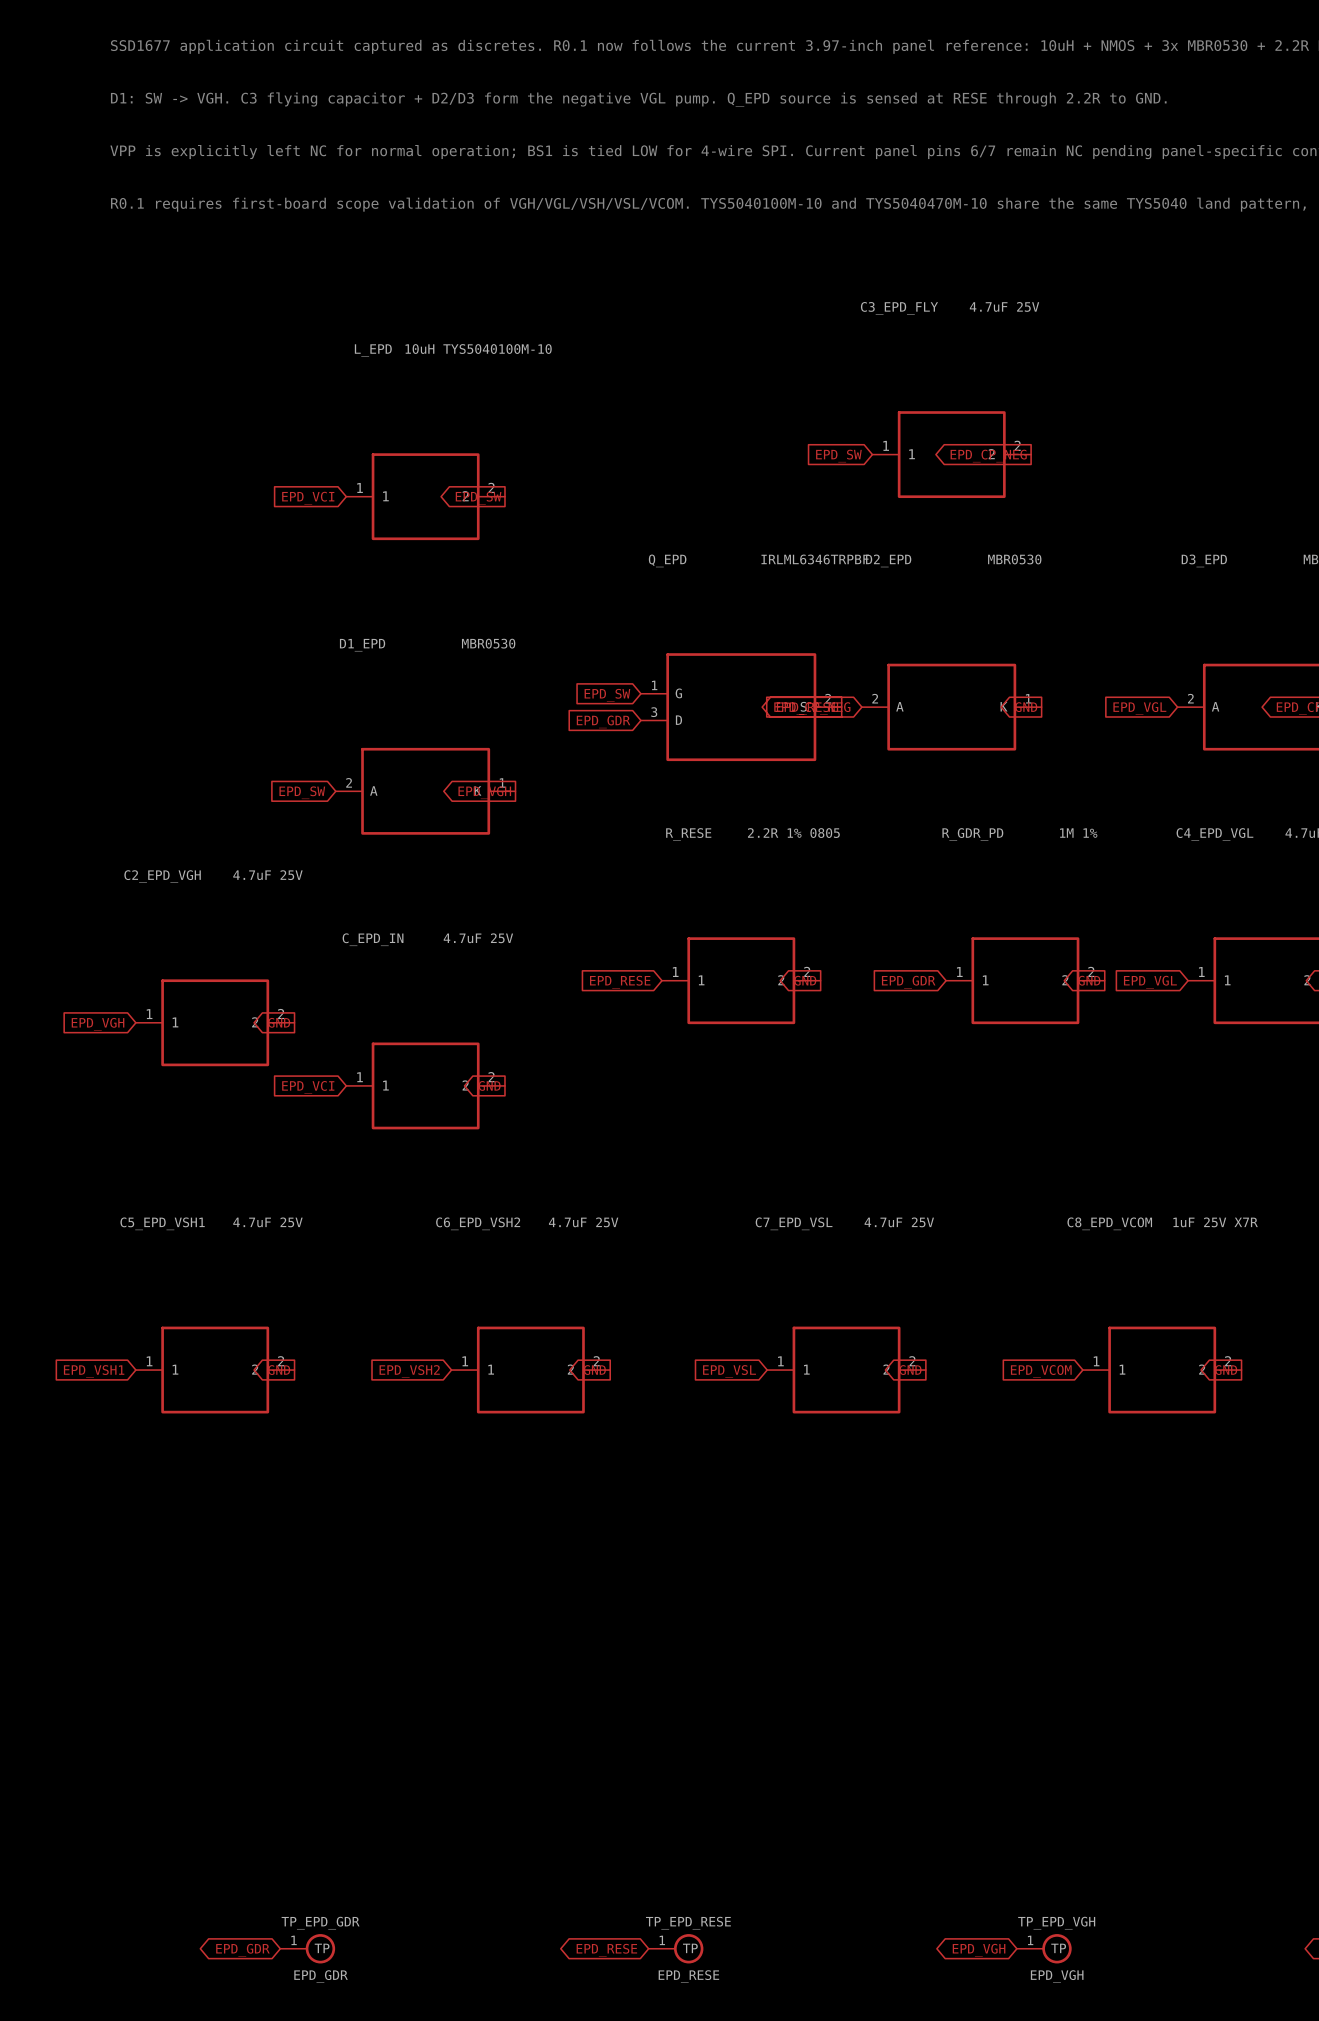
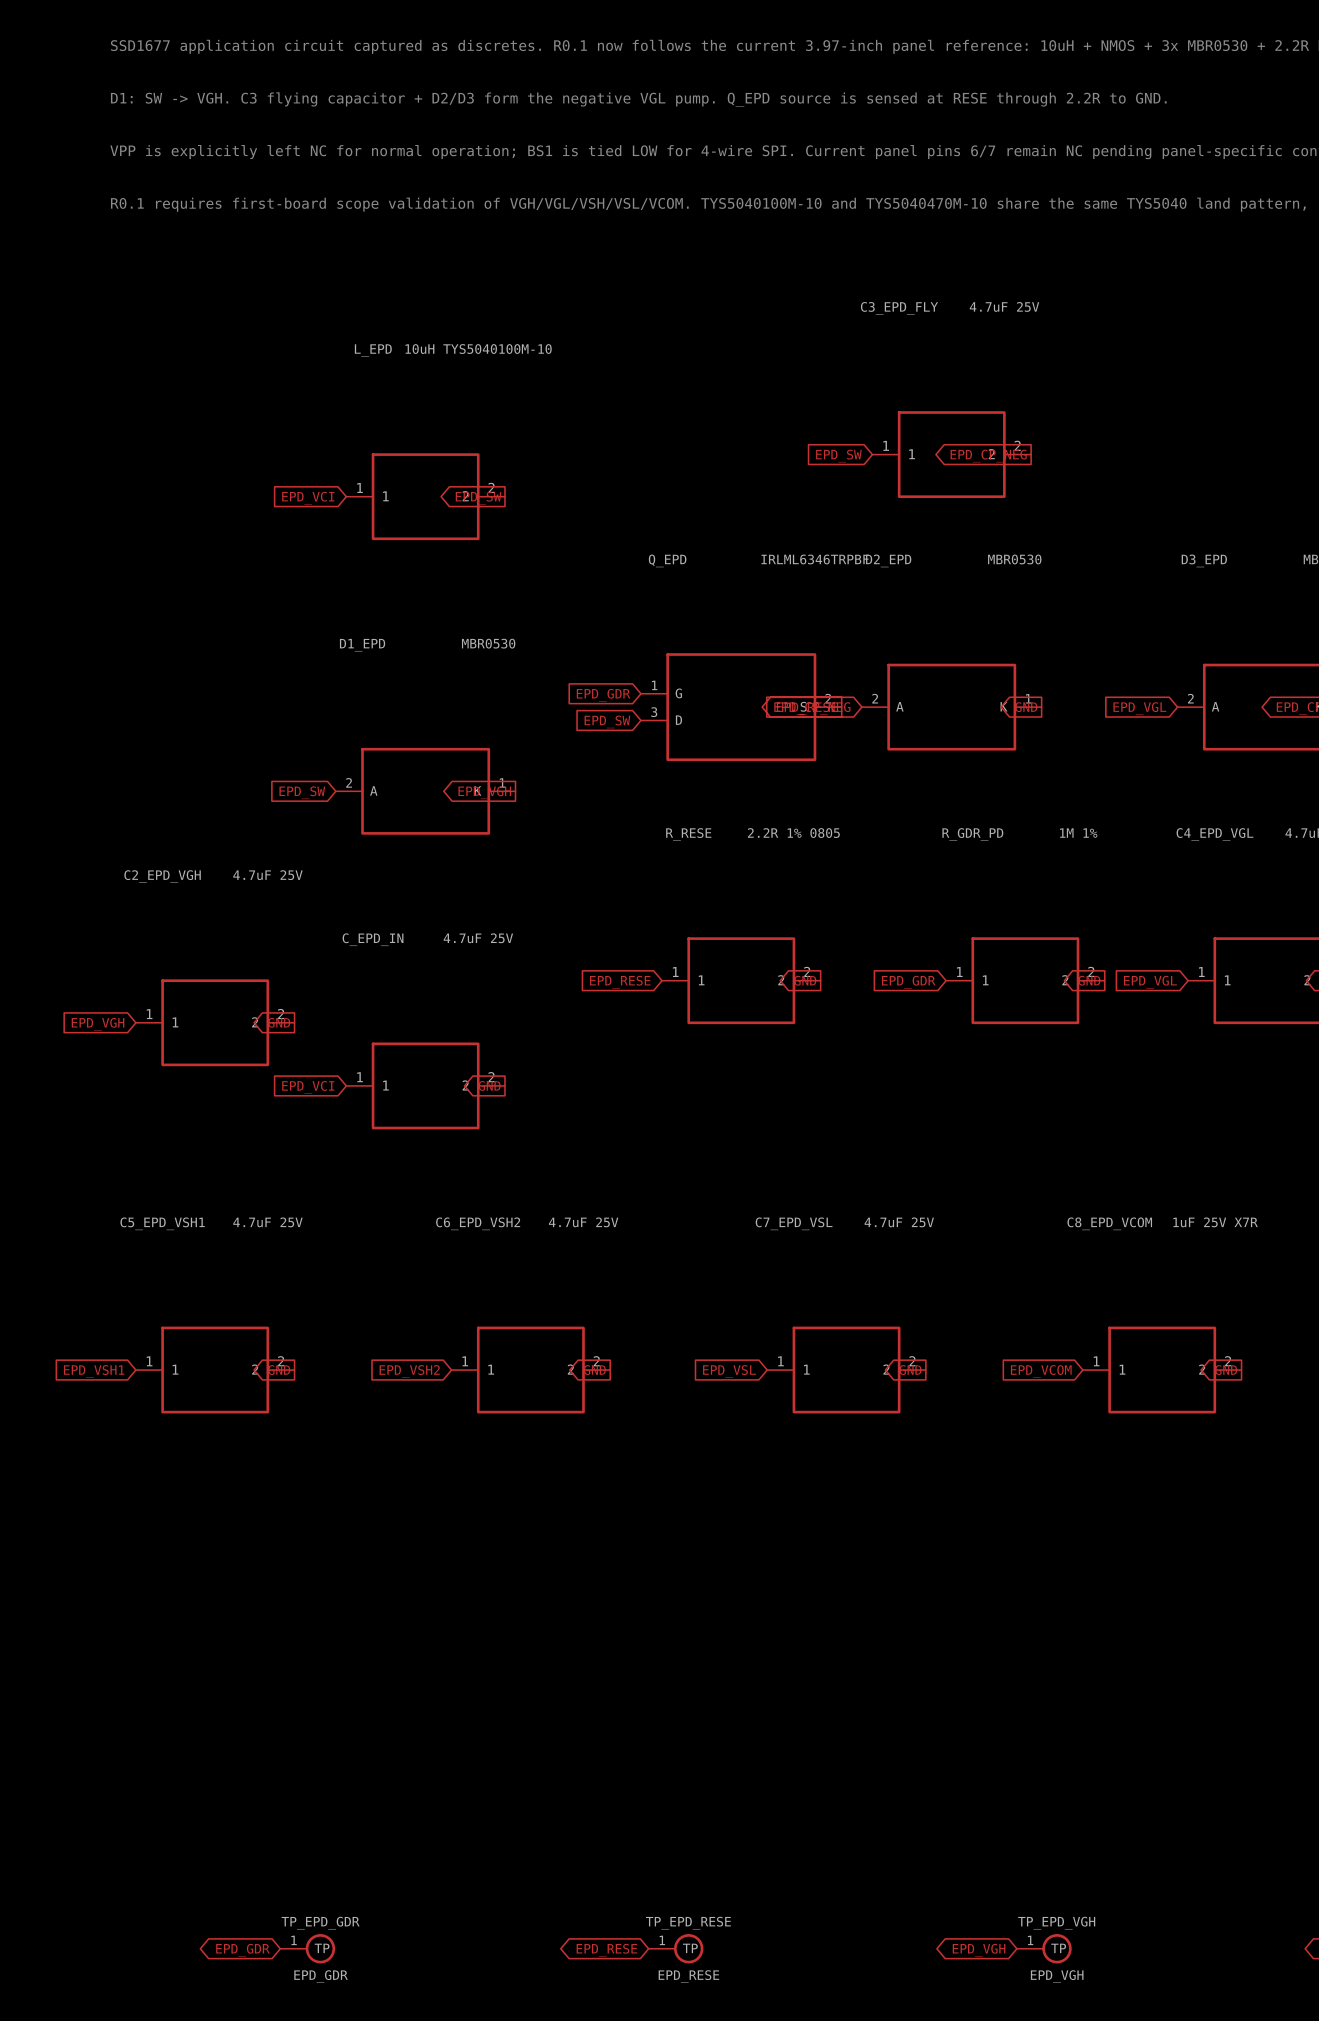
global label: EPD_SW (607, 695) -> EPD_GDR (603, 695)
global label: EPD_GDR (603, 721) -> EPD_SW (607, 721)

